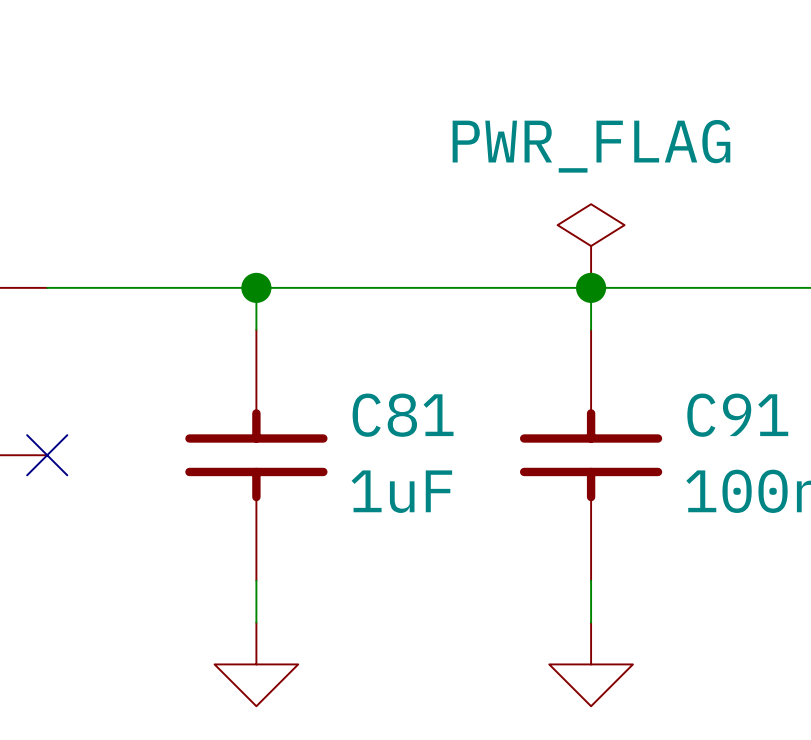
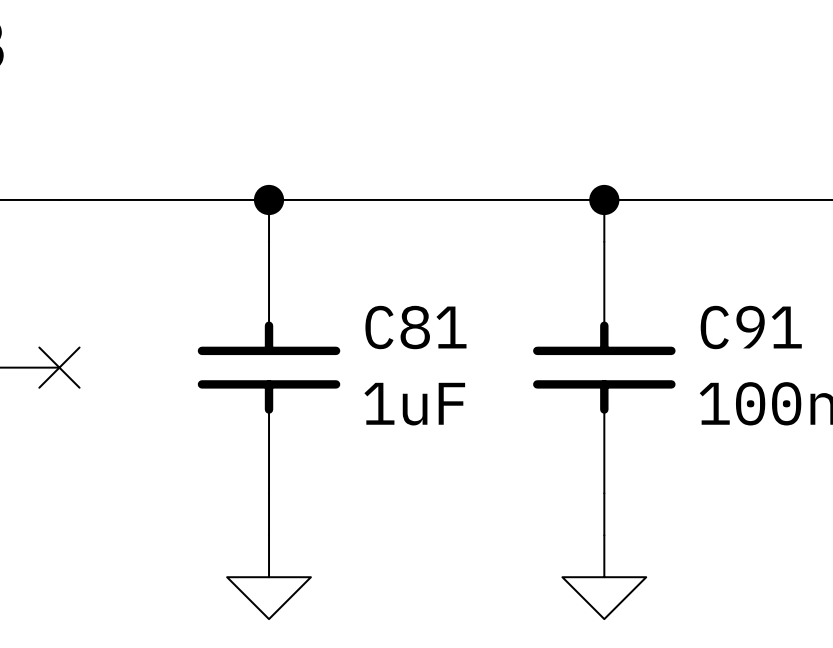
power symbol: PWR_FLAG (591, 246) -> none

